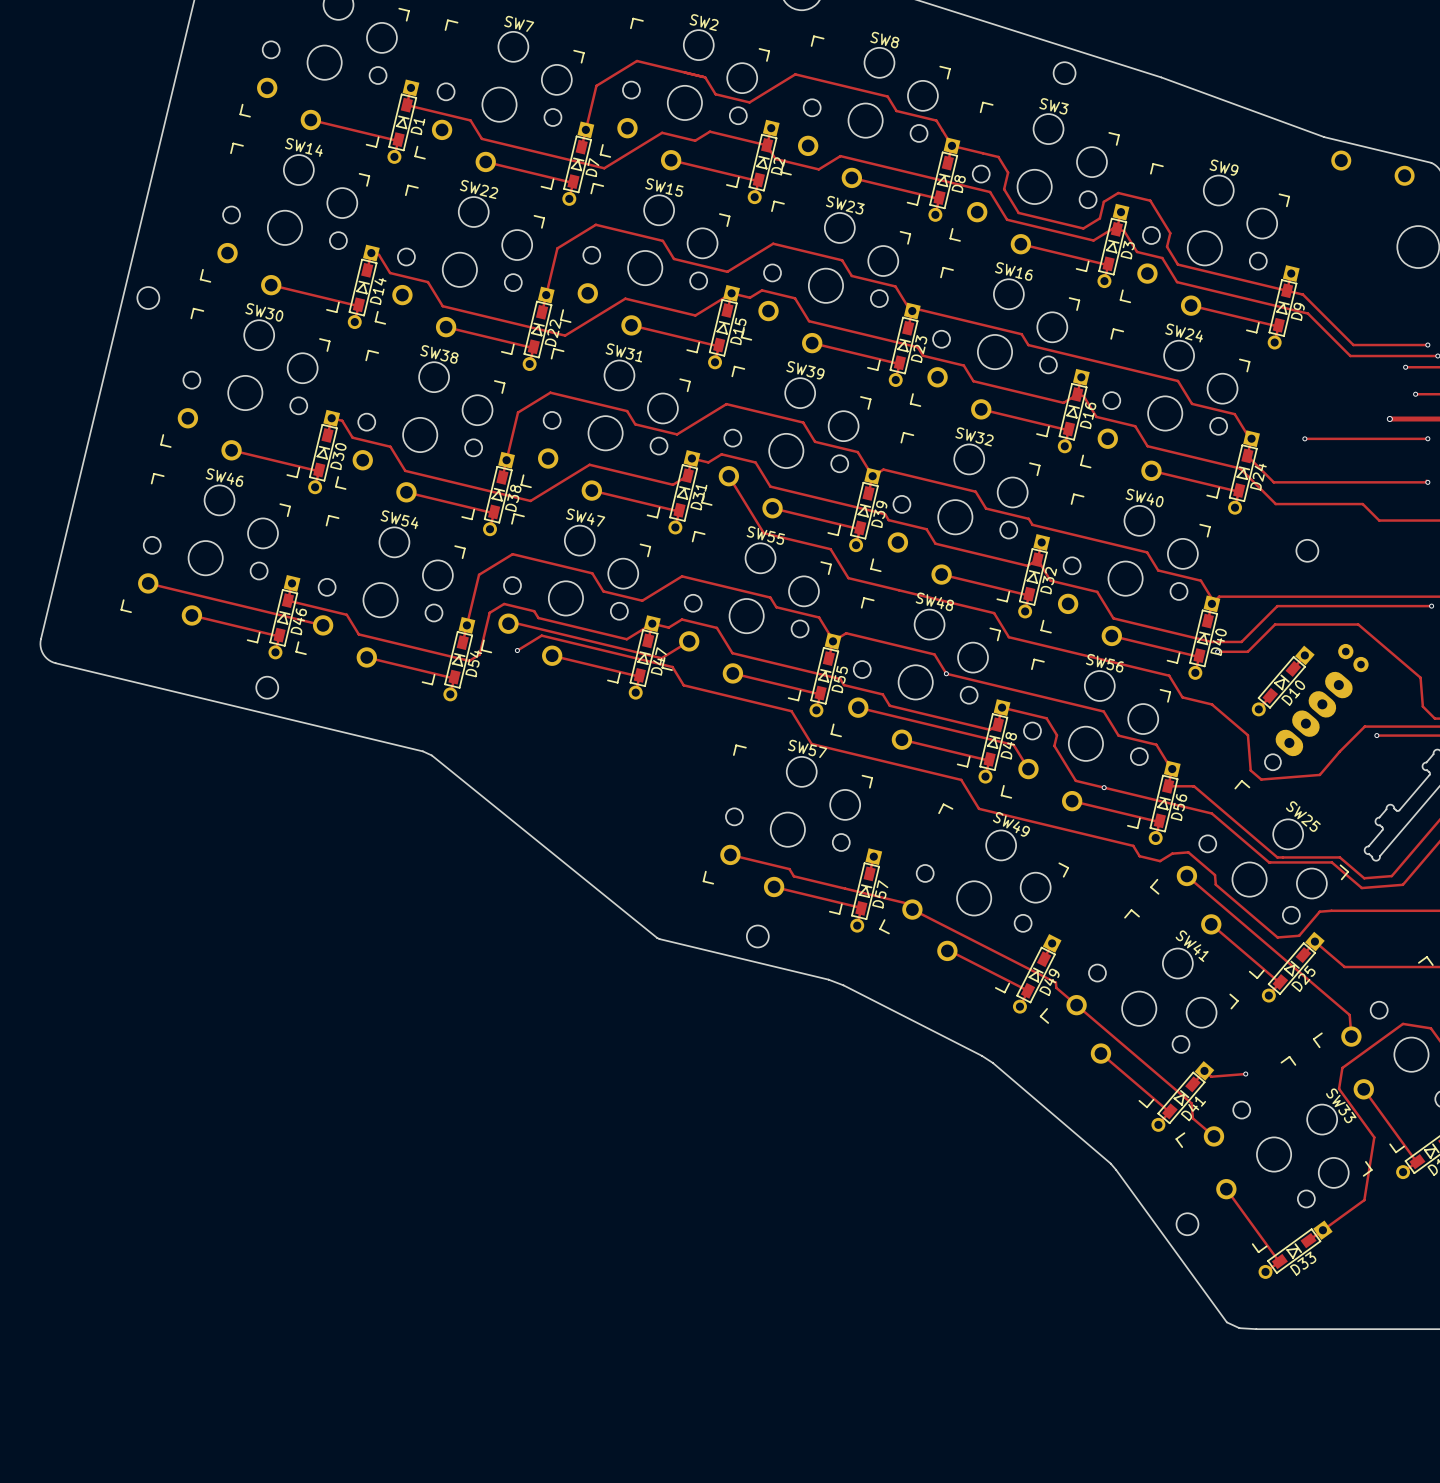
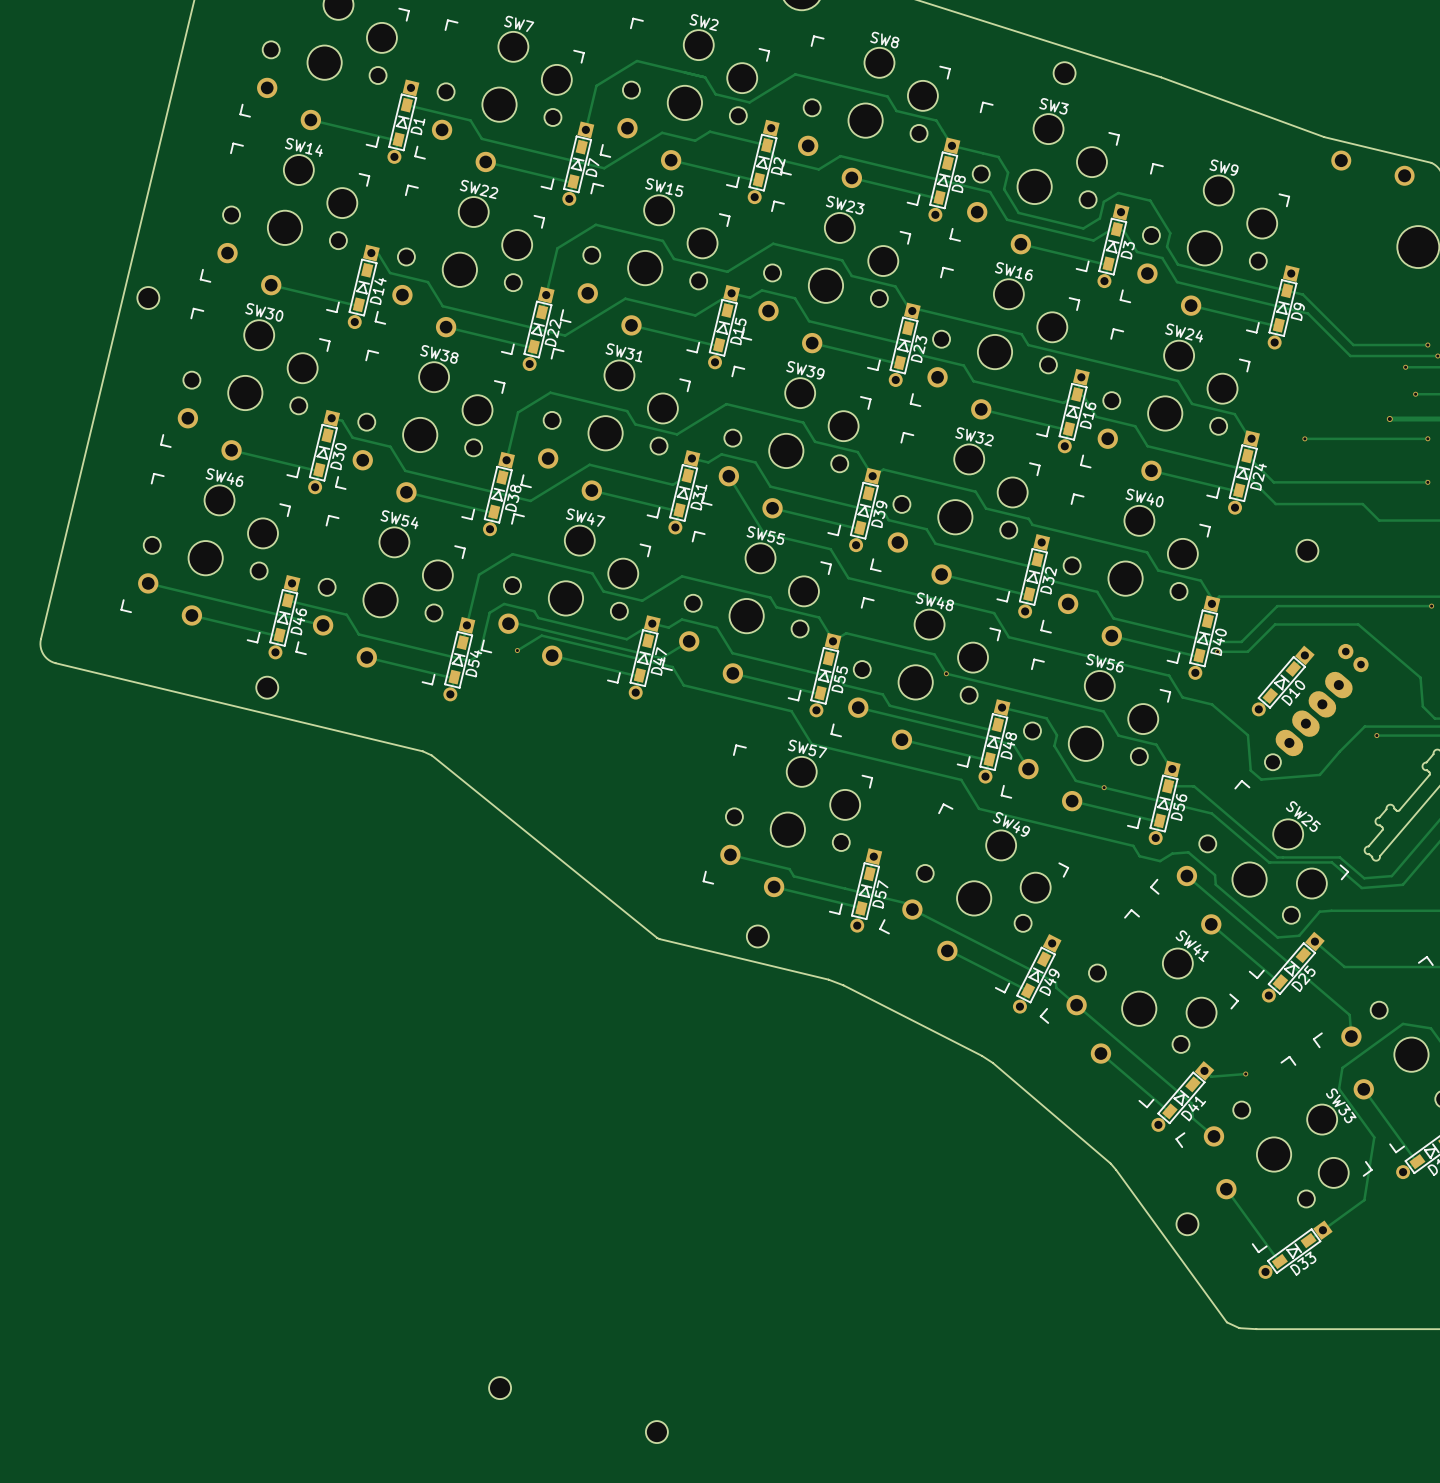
part: none -> (500, 1388)
part: none -> (656, 1432)

